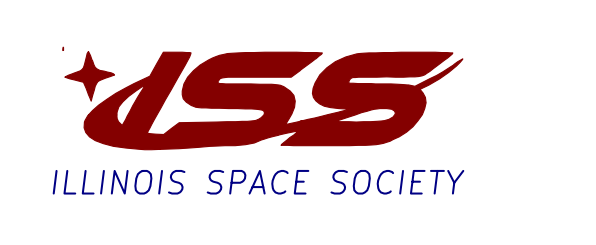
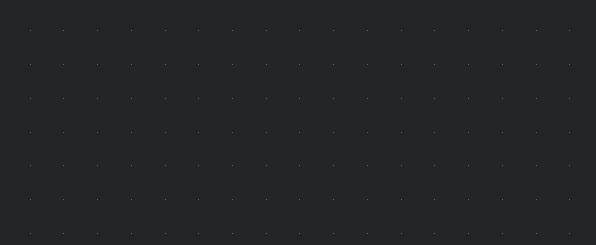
power symbol: (262, 98) -> none
text: ILLINOIS SPACE SOCIETY (258, 182) -> none

